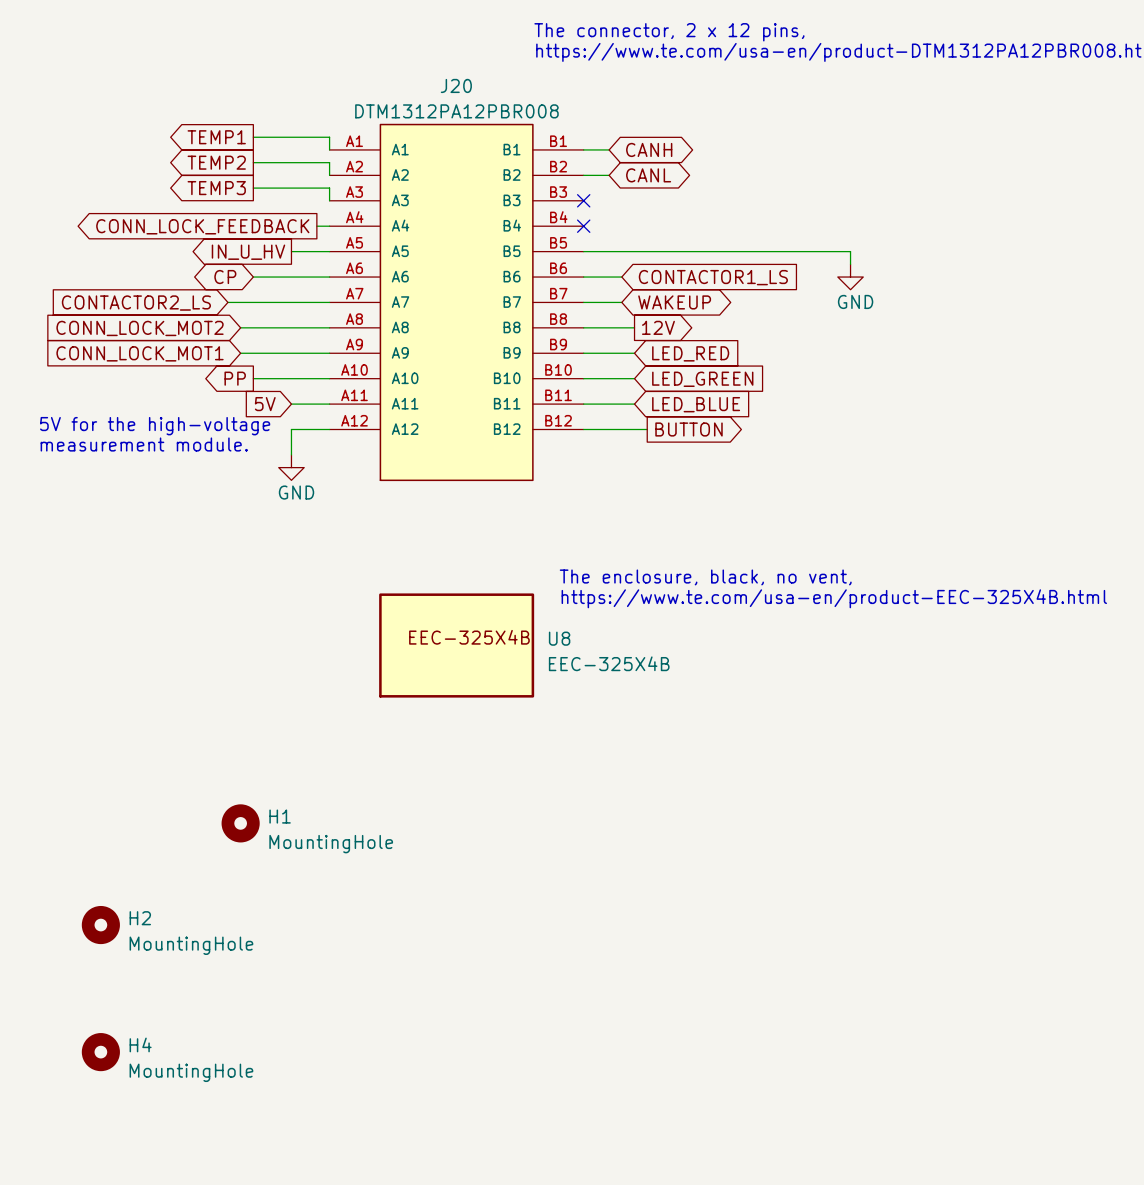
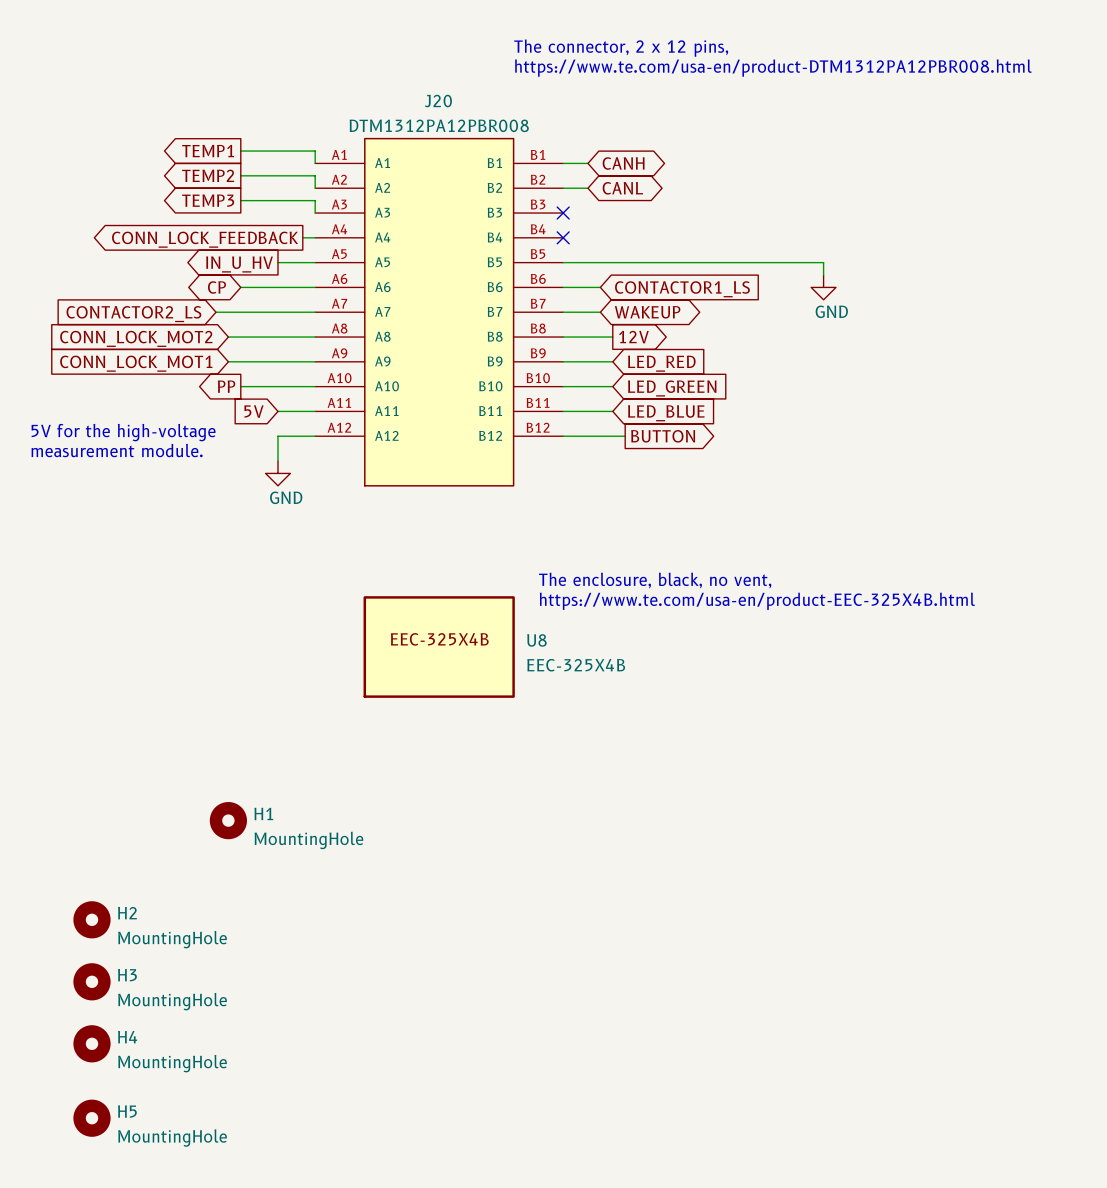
H3: none -> MountingHole (91, 981)
H5: none -> MountingHole (91, 1118)

